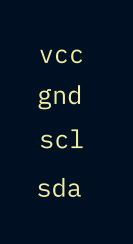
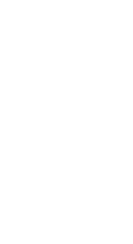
text: vcc (61, 56) -> none
text: gnd (59, 97) -> none
text: scl (61, 138) -> none
text: sda (59, 187) -> none

